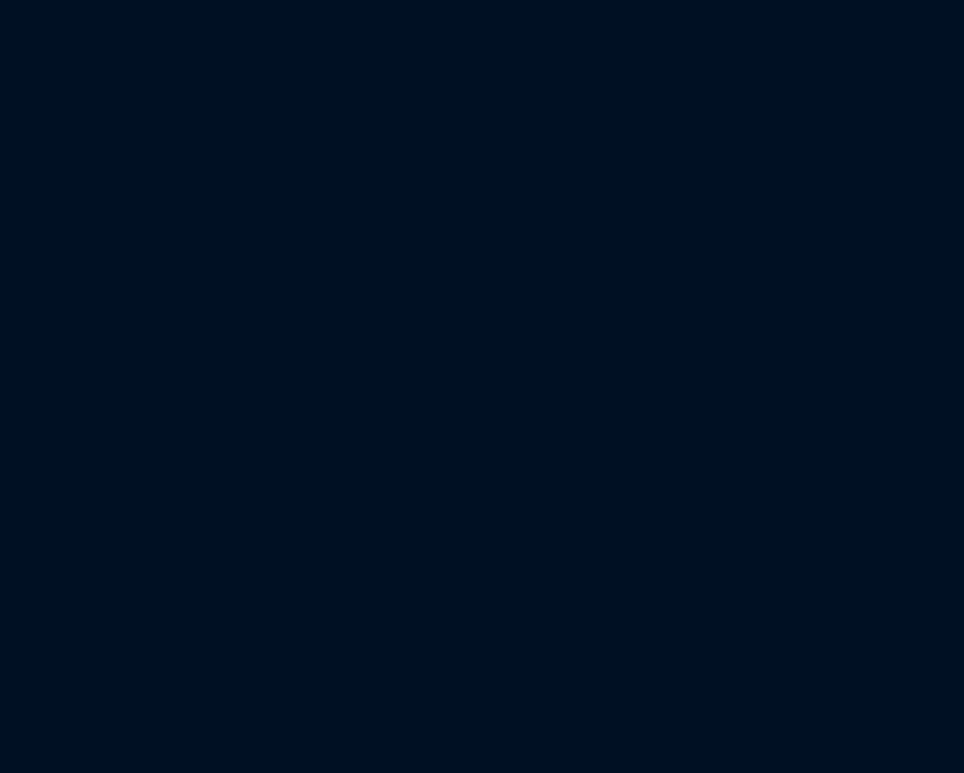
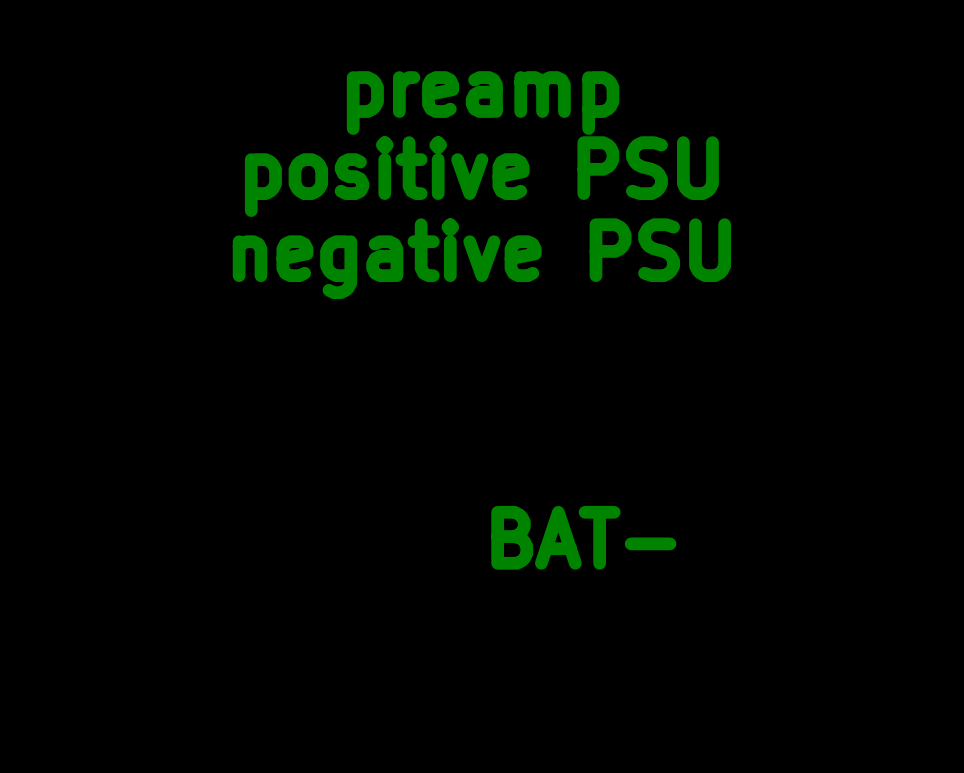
text: none -> preamp (483, 103)
text: none -> positive PSU (481, 176)
text: none -> negative PSU (481, 258)
text: none -> BAT- (583, 537)

